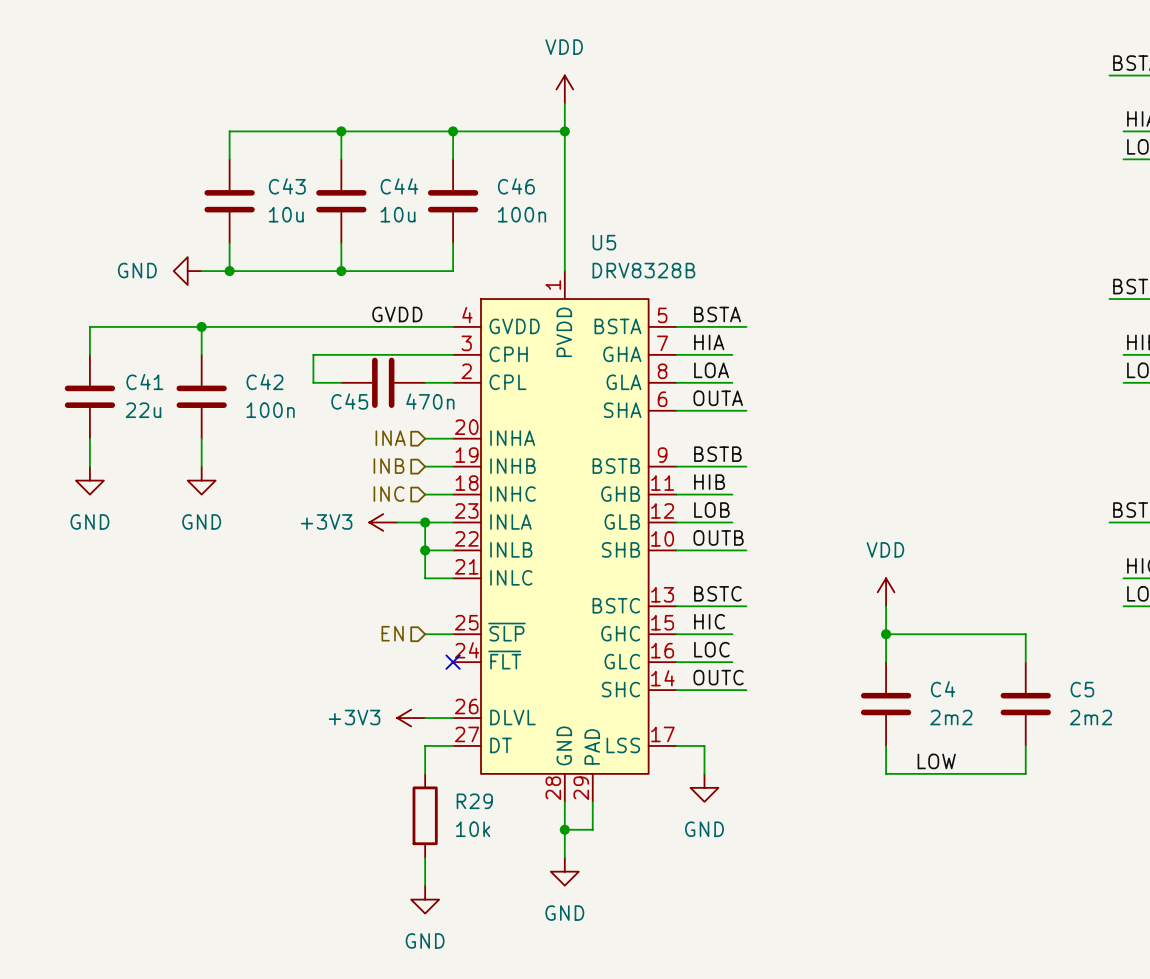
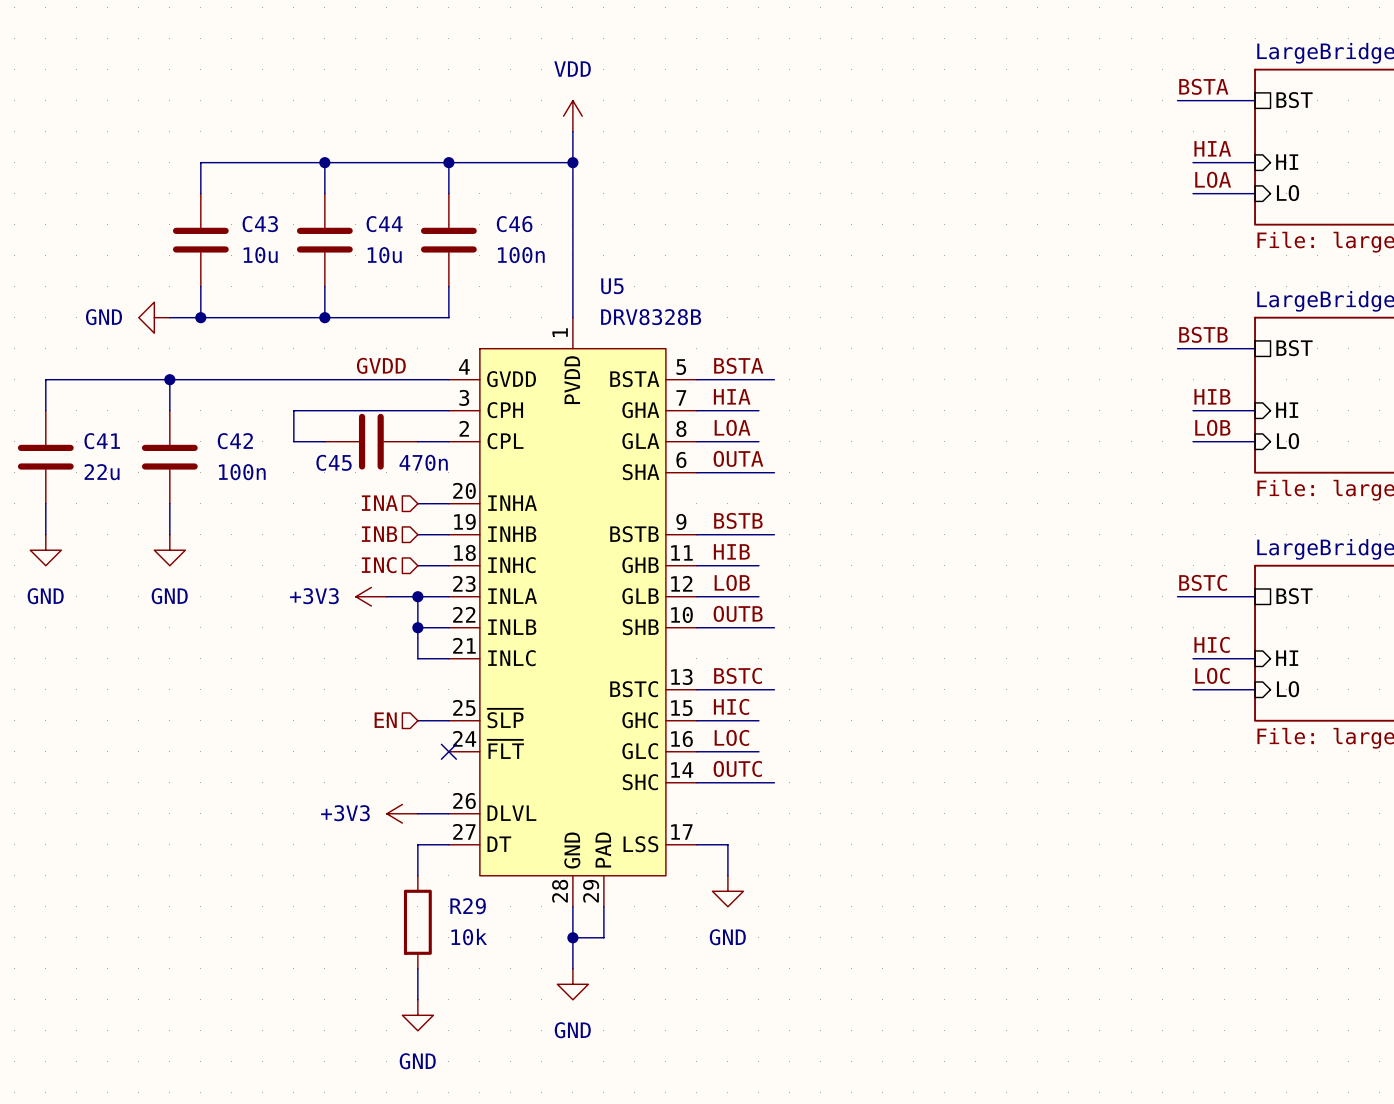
power symbol: VDD (886, 592) -> none
wire: (886, 606) (886, 662) -> none
wire: (886, 634) (1025, 634) (1025, 662) -> none
junction: (886, 634) -> none
C4: 2m2 (886, 704) -> none
C5: 2m2 (1025, 704) -> none
wire: (886, 745) (886, 773) (1025, 773) (1025, 745) -> none
label: LOW (936, 761) -> none

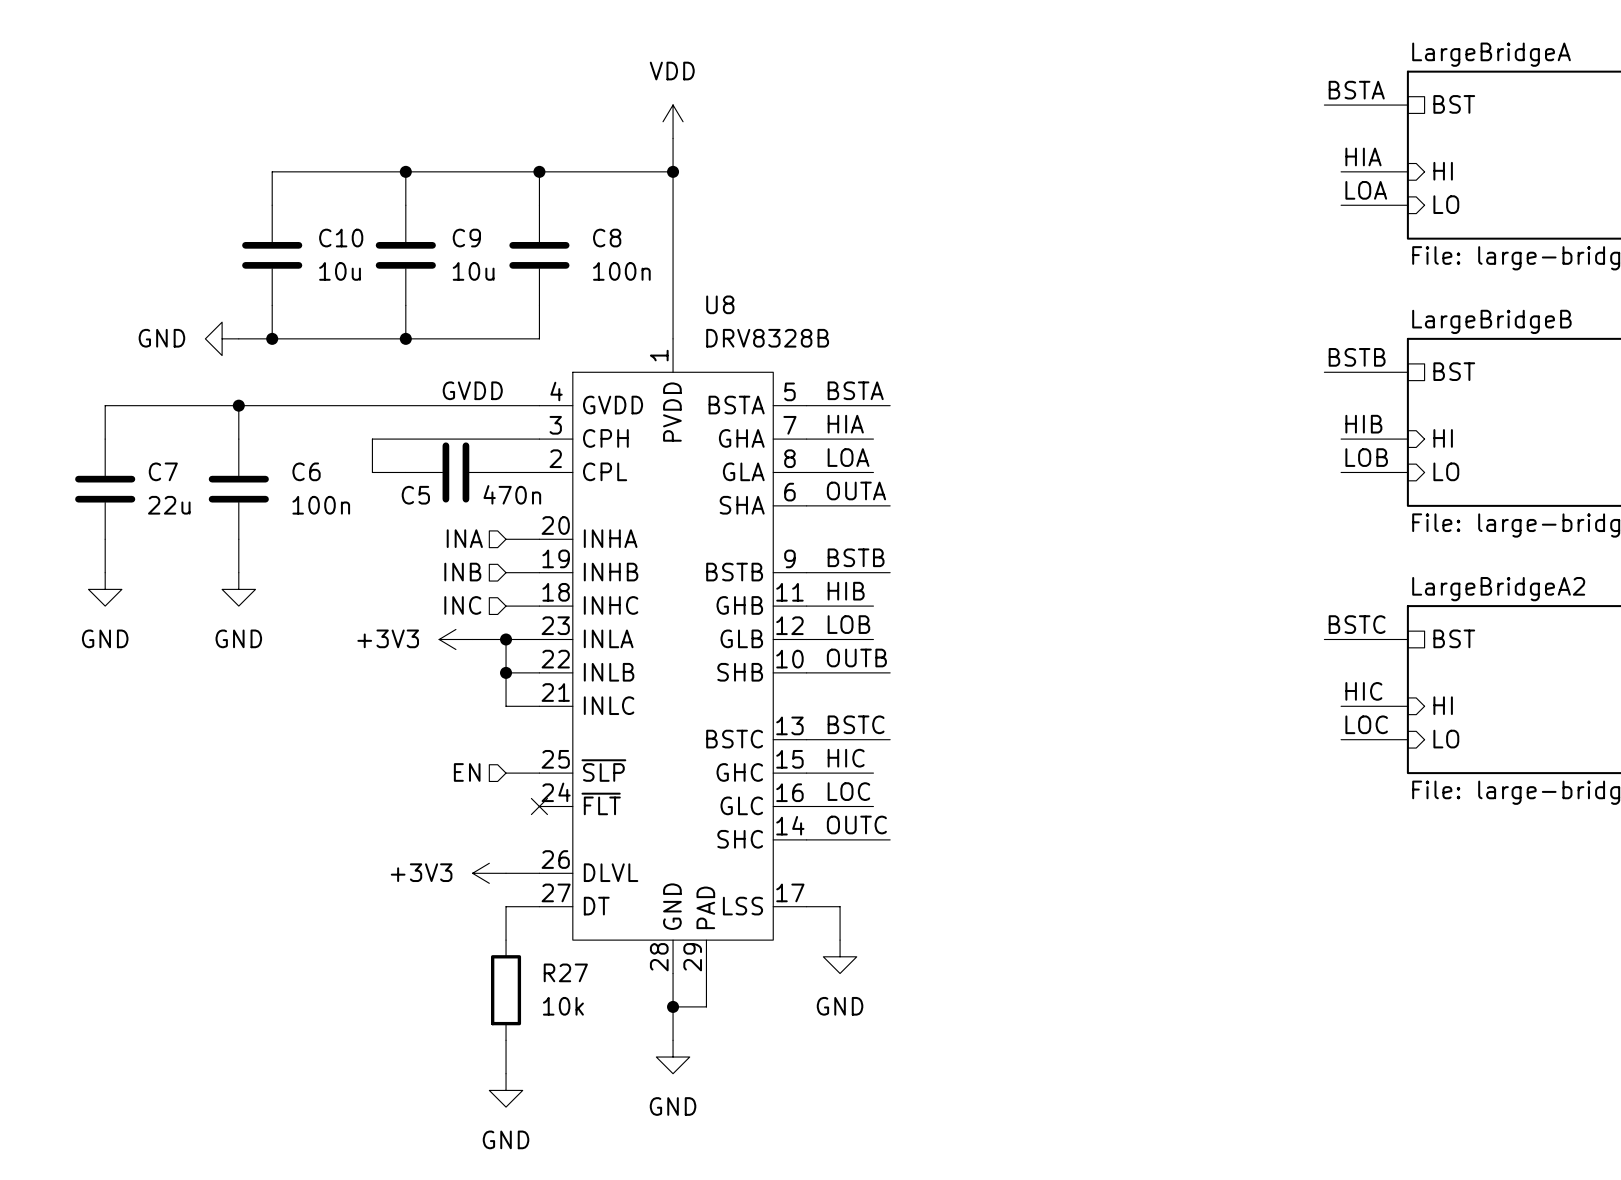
C43 name: C43 (260, 224) -> C10 (341, 238)
C44 name: C44 (384, 224) -> C9 (466, 238)
C46 name: C46 (514, 224) -> C8 (607, 238)
U5 name: U5 (612, 286) -> U8 (720, 304)
C41 name: C41 (102, 441) -> C7 (163, 471)
C42 name: C42 (235, 441) -> C6 (306, 471)
C45 name: C45 (334, 462) -> C5 (415, 495)
R29 name: R29 (468, 906) -> R27 (565, 972)

